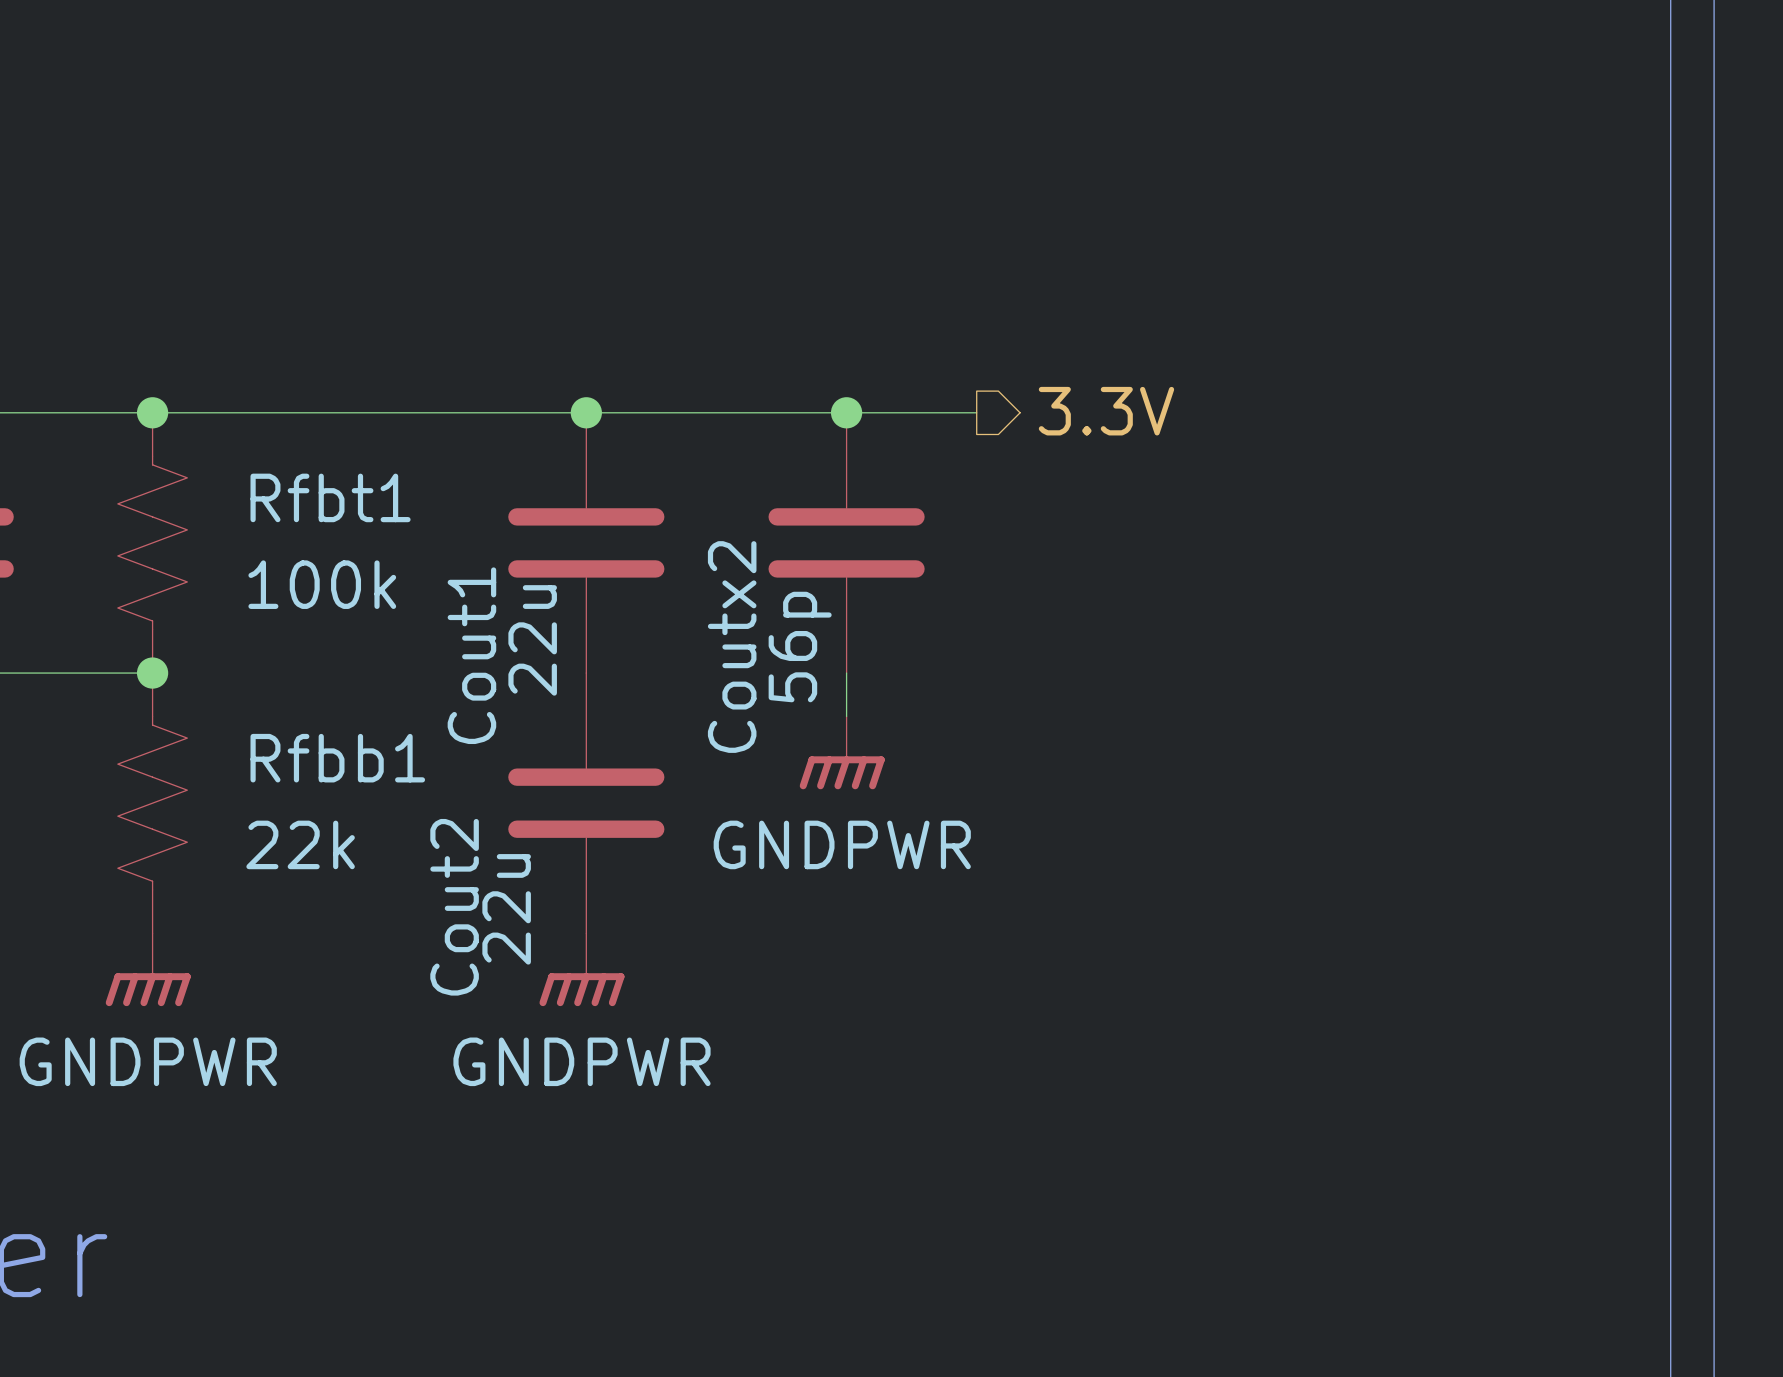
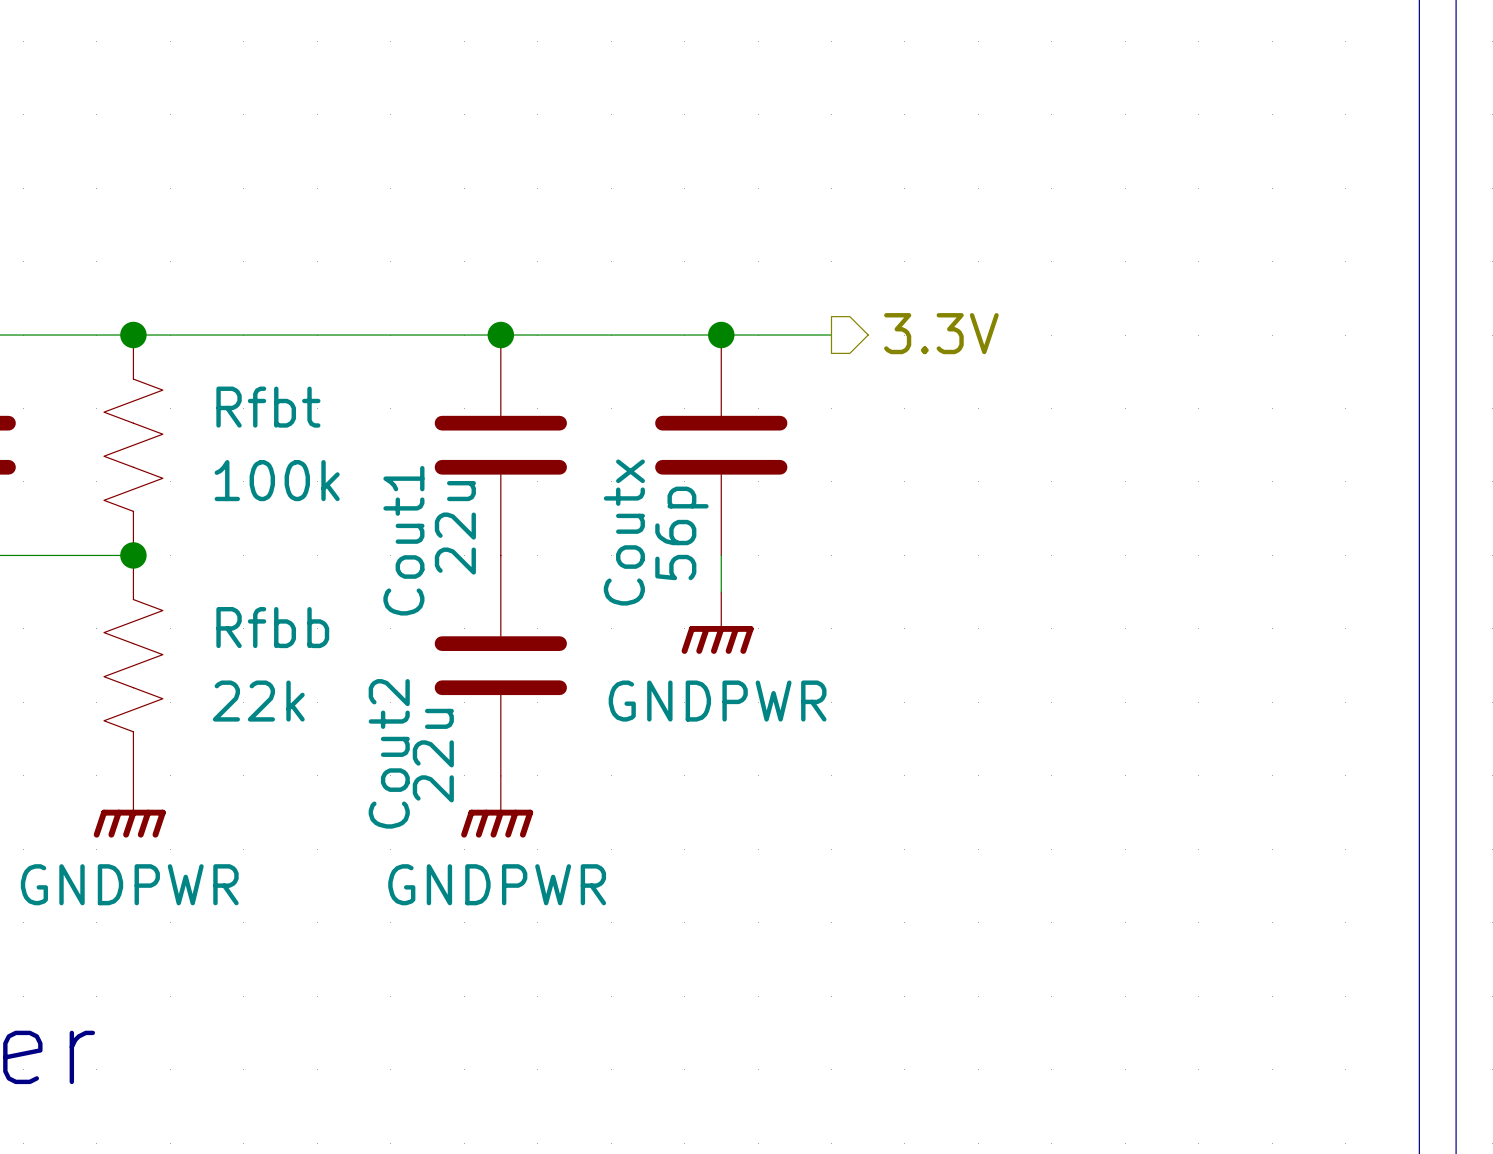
Rfbt1 name: Rfbt1 (330, 497) -> Rfbt (268, 407)
Coutx2 name: Coutx2 (732, 647) -> Coutx (624, 532)
Rfbb1 name: Rfbb1 (337, 758) -> Rfbb (272, 627)

